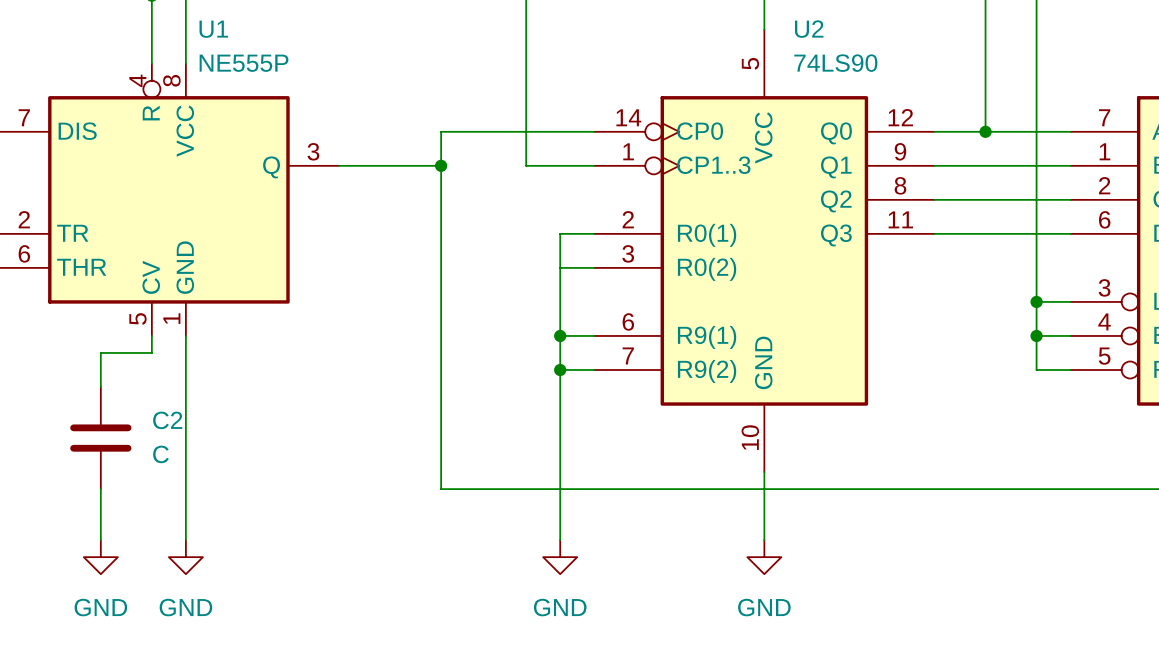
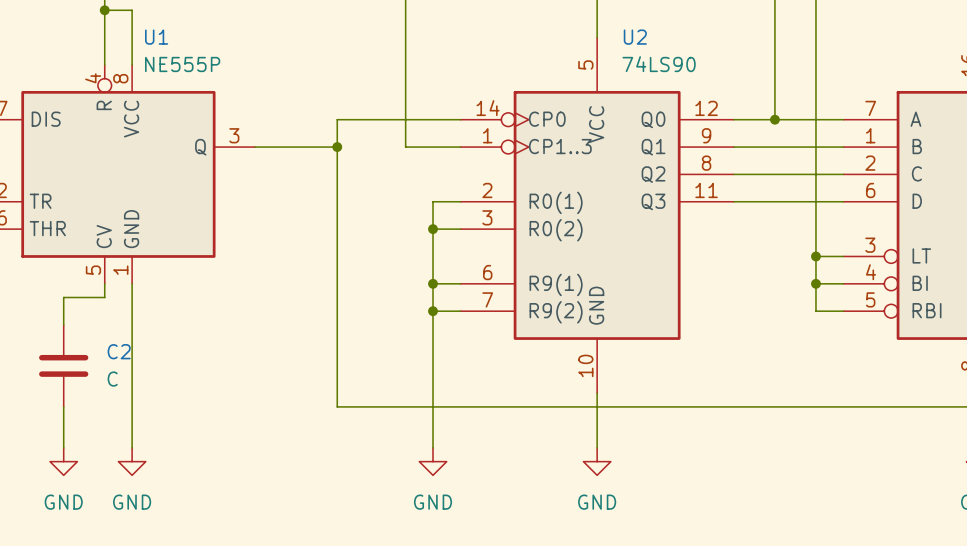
junction: none -> (433, 229)

